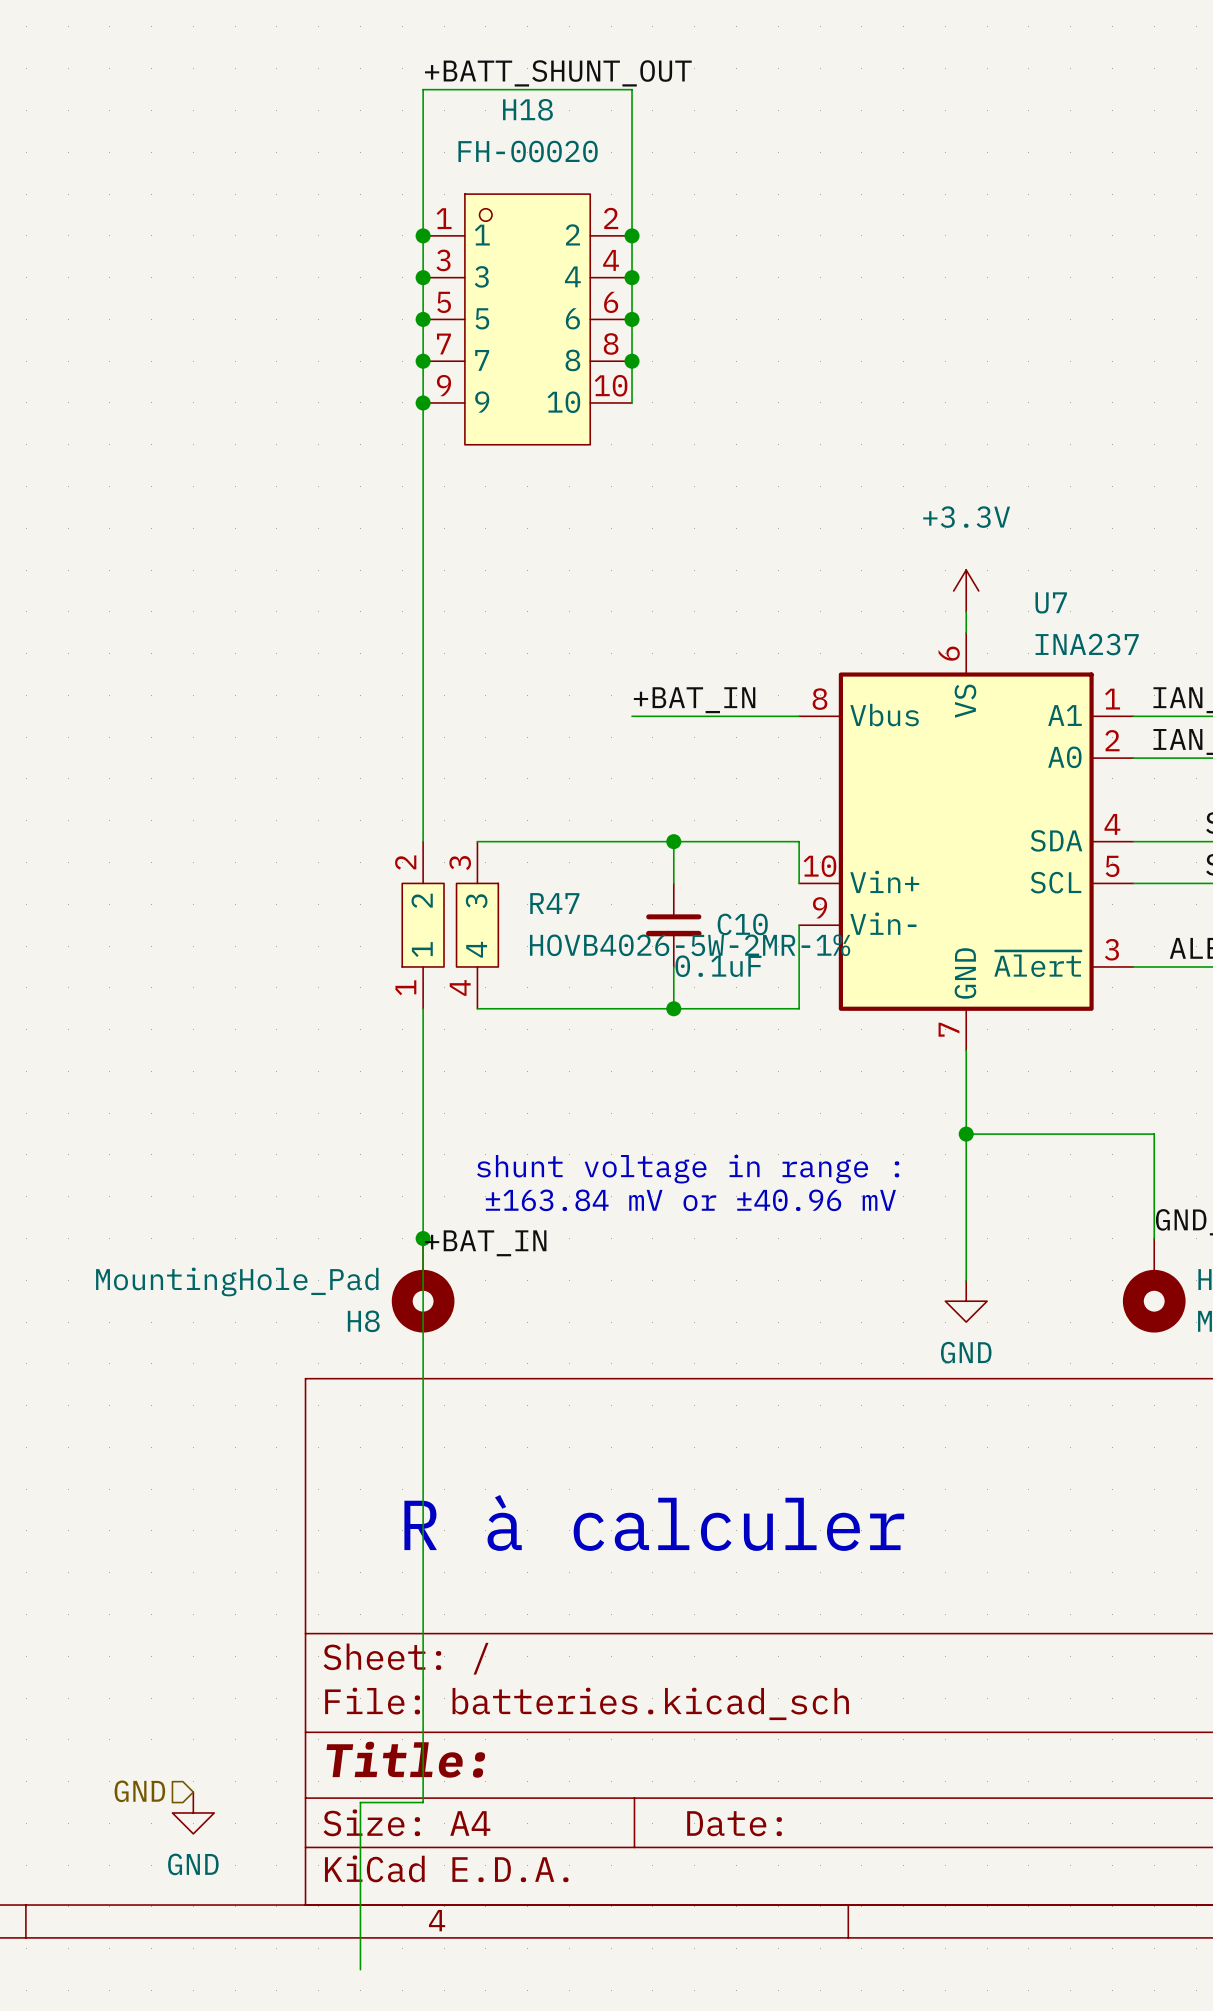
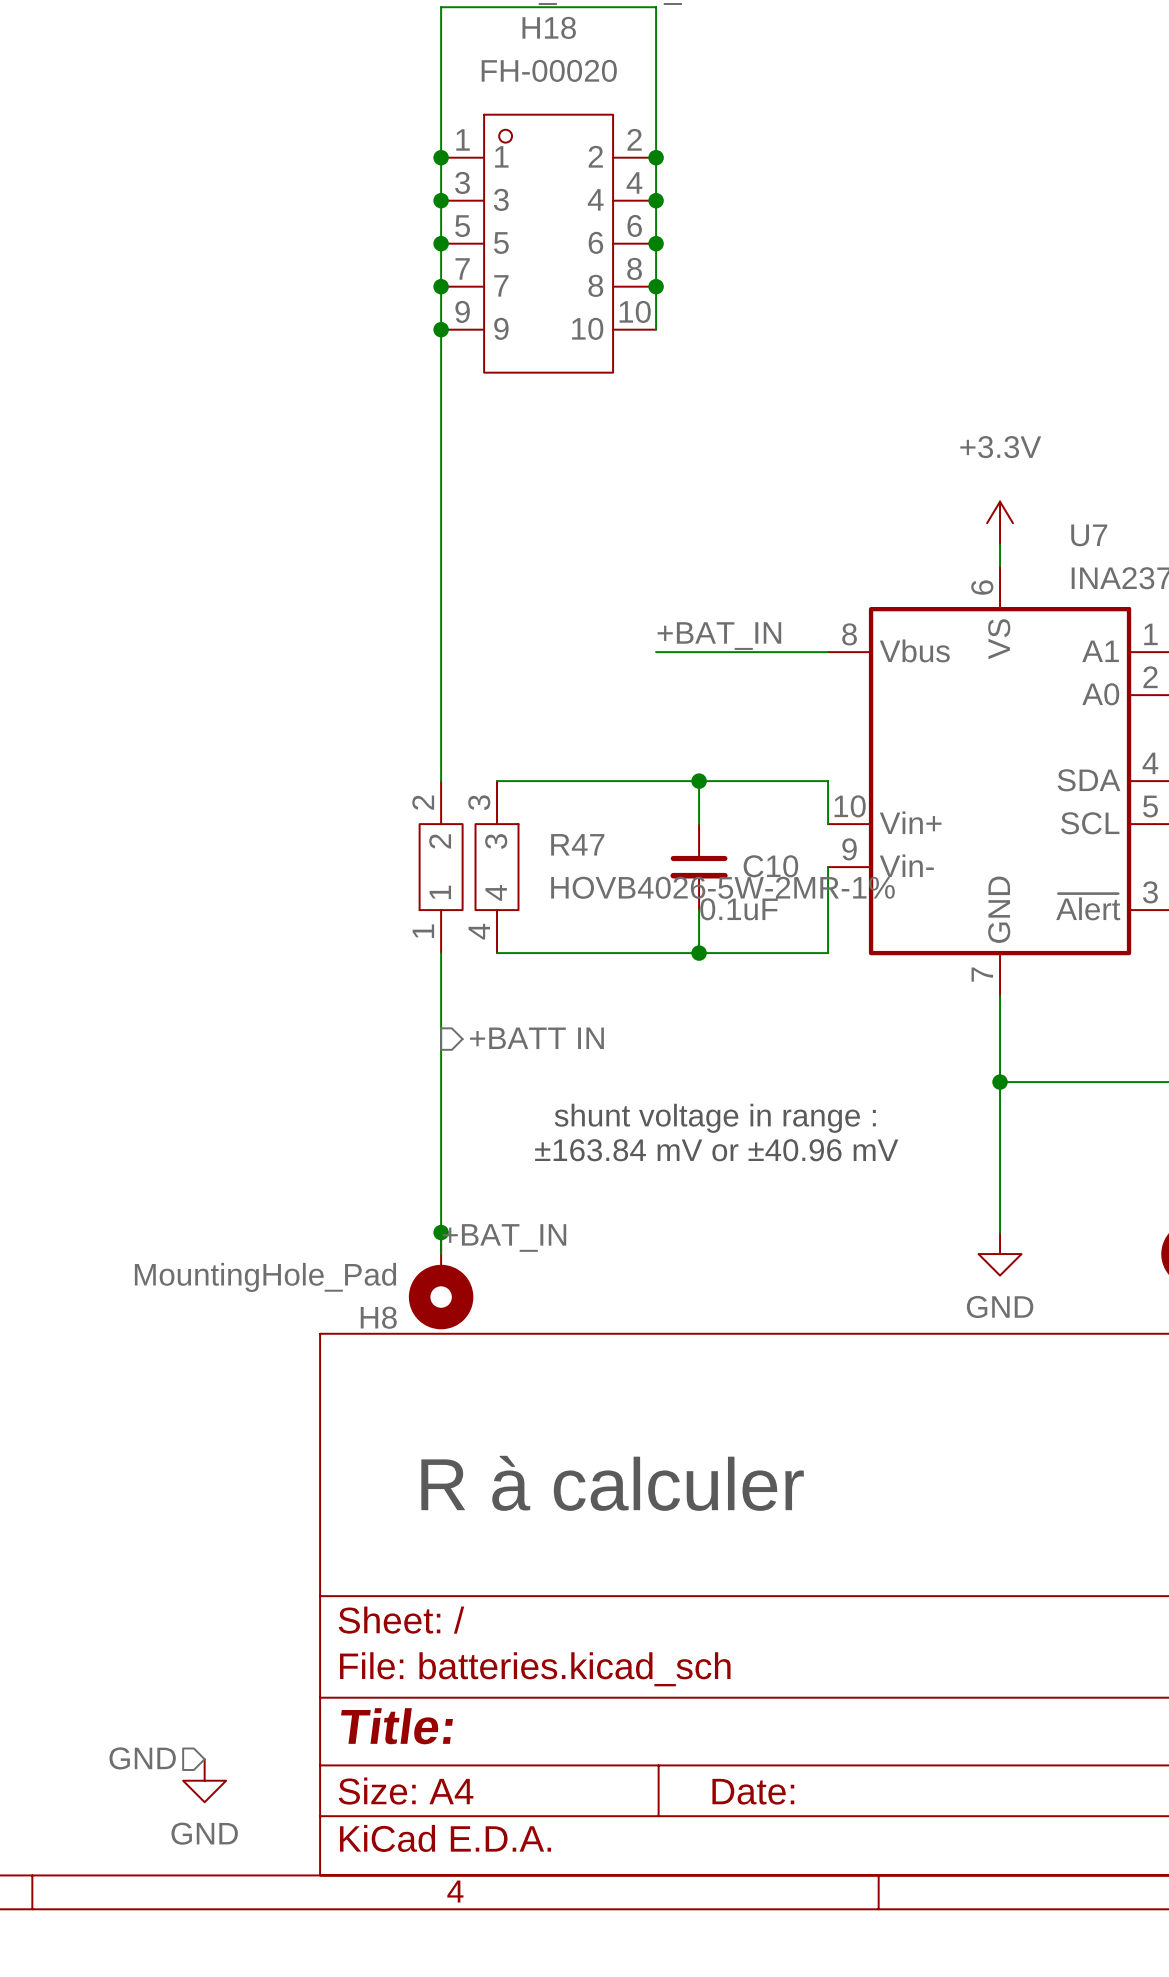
hierarchical label: none -> +BATT IN (536, 1038)
junction position: (423, 1238) -> (441, 1232)
label position: +BAT_IN (485, 1243) -> +BAT_IN (504, 1237)
H8 position: (423, 1285) -> (441, 1280)
wire: (423, 1301) (423, 1802) (360, 1802) (360, 1969) -> none

